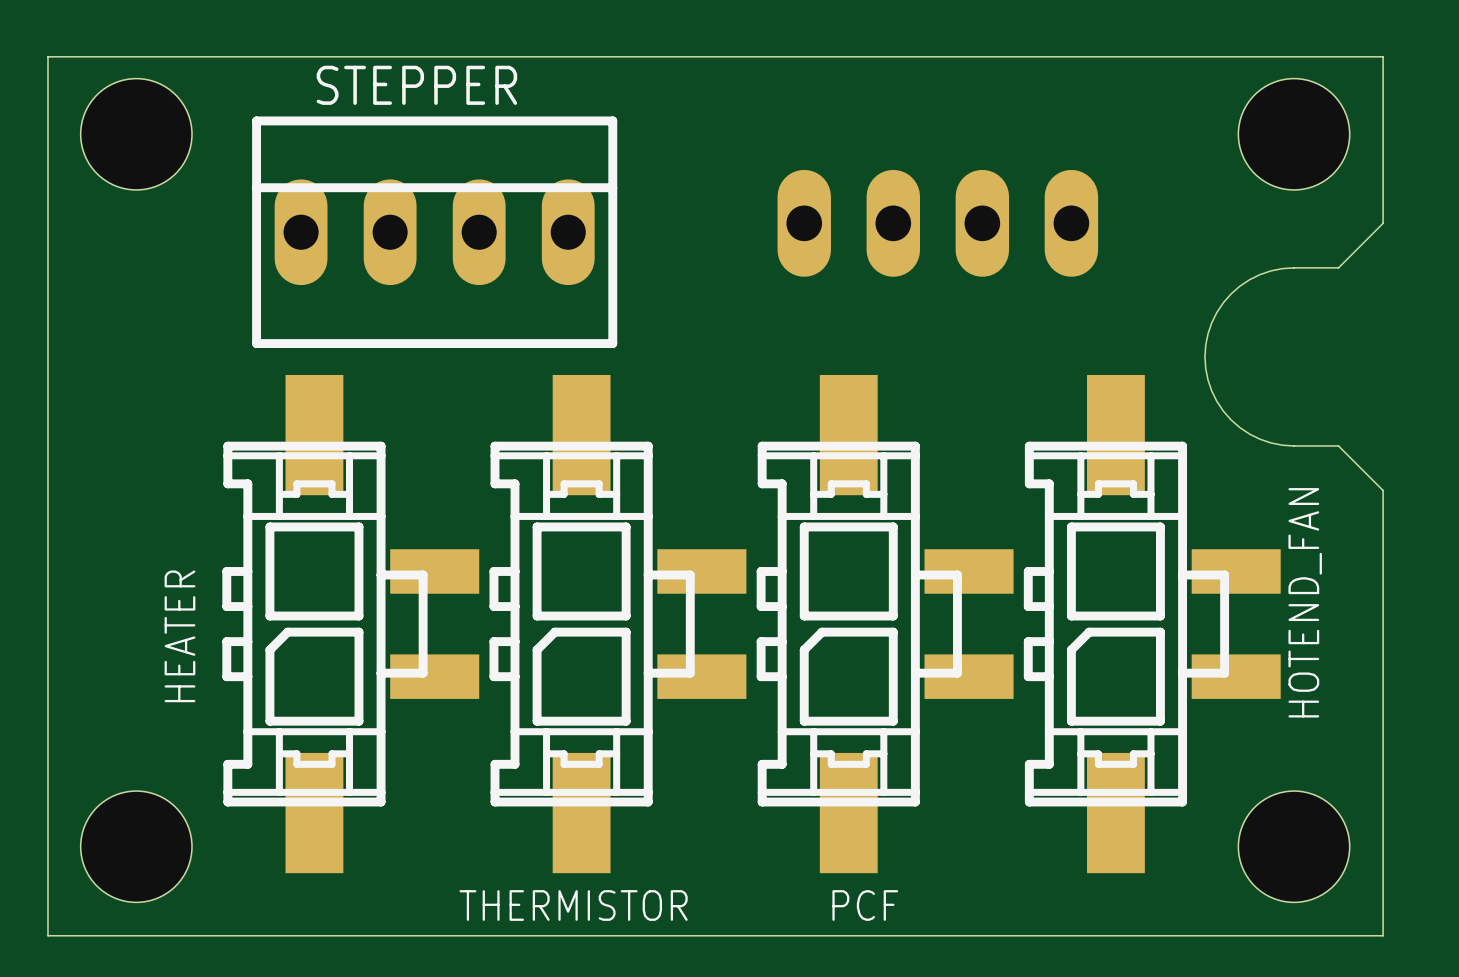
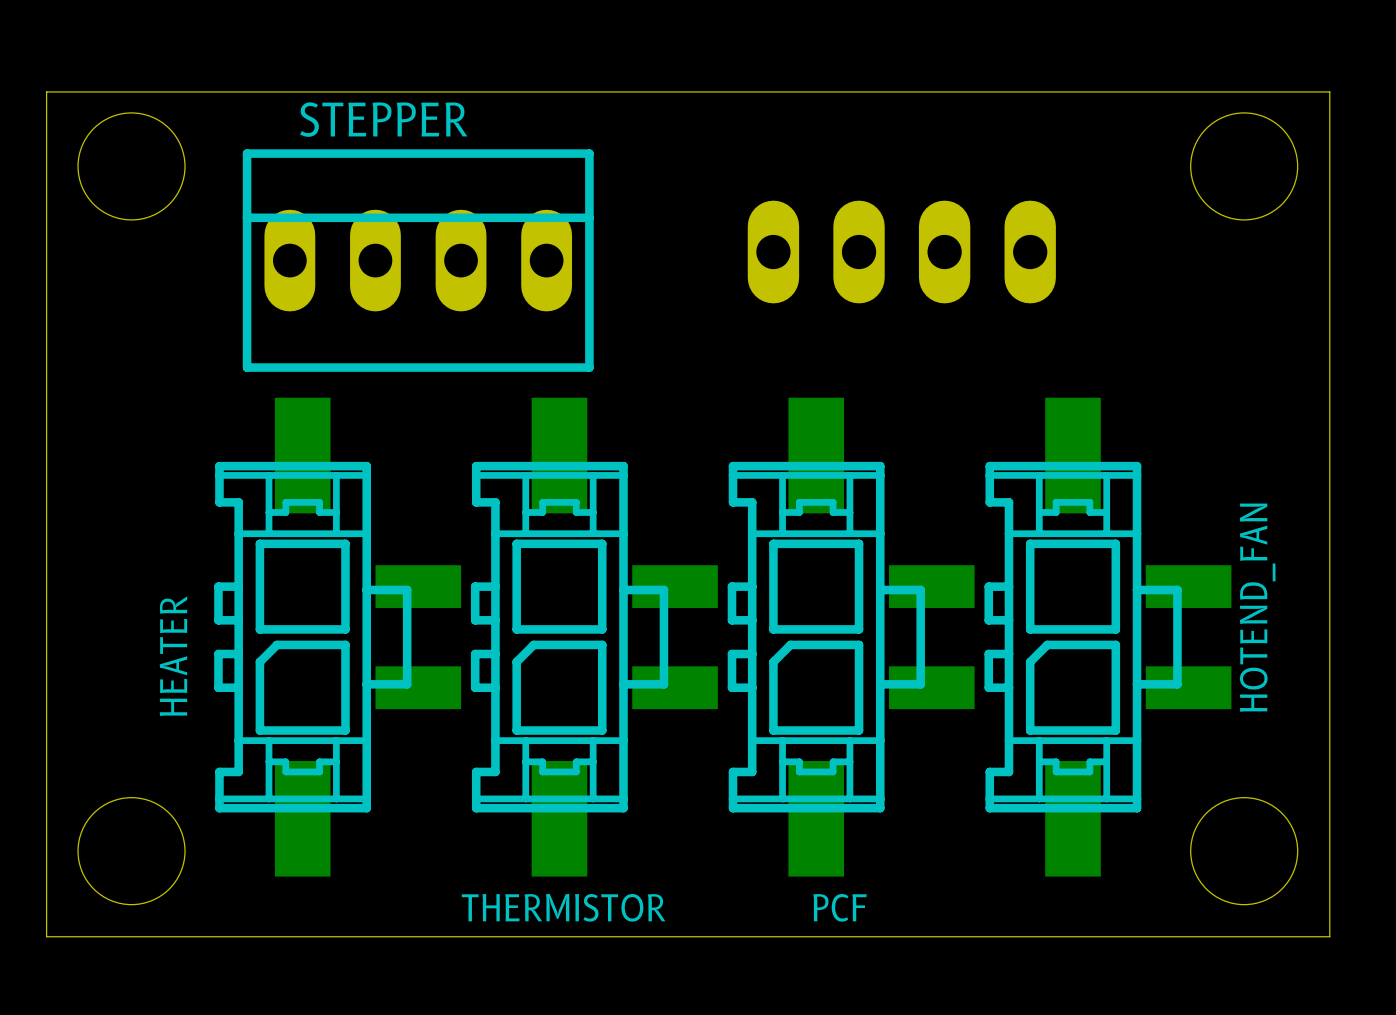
board edge: (1383, 223) (1338, 267) (1282, 268) (1259, 274) (1239, 286) (1223, 302) (1211, 322) (1208, 333) (1204, 356) (1208, 379) (1211, 391) (1223, 411) (1239, 427) (1259, 439) (1282, 445) (1338, 445) (1383, 490) -> (1329, 252) (1329, 508)

